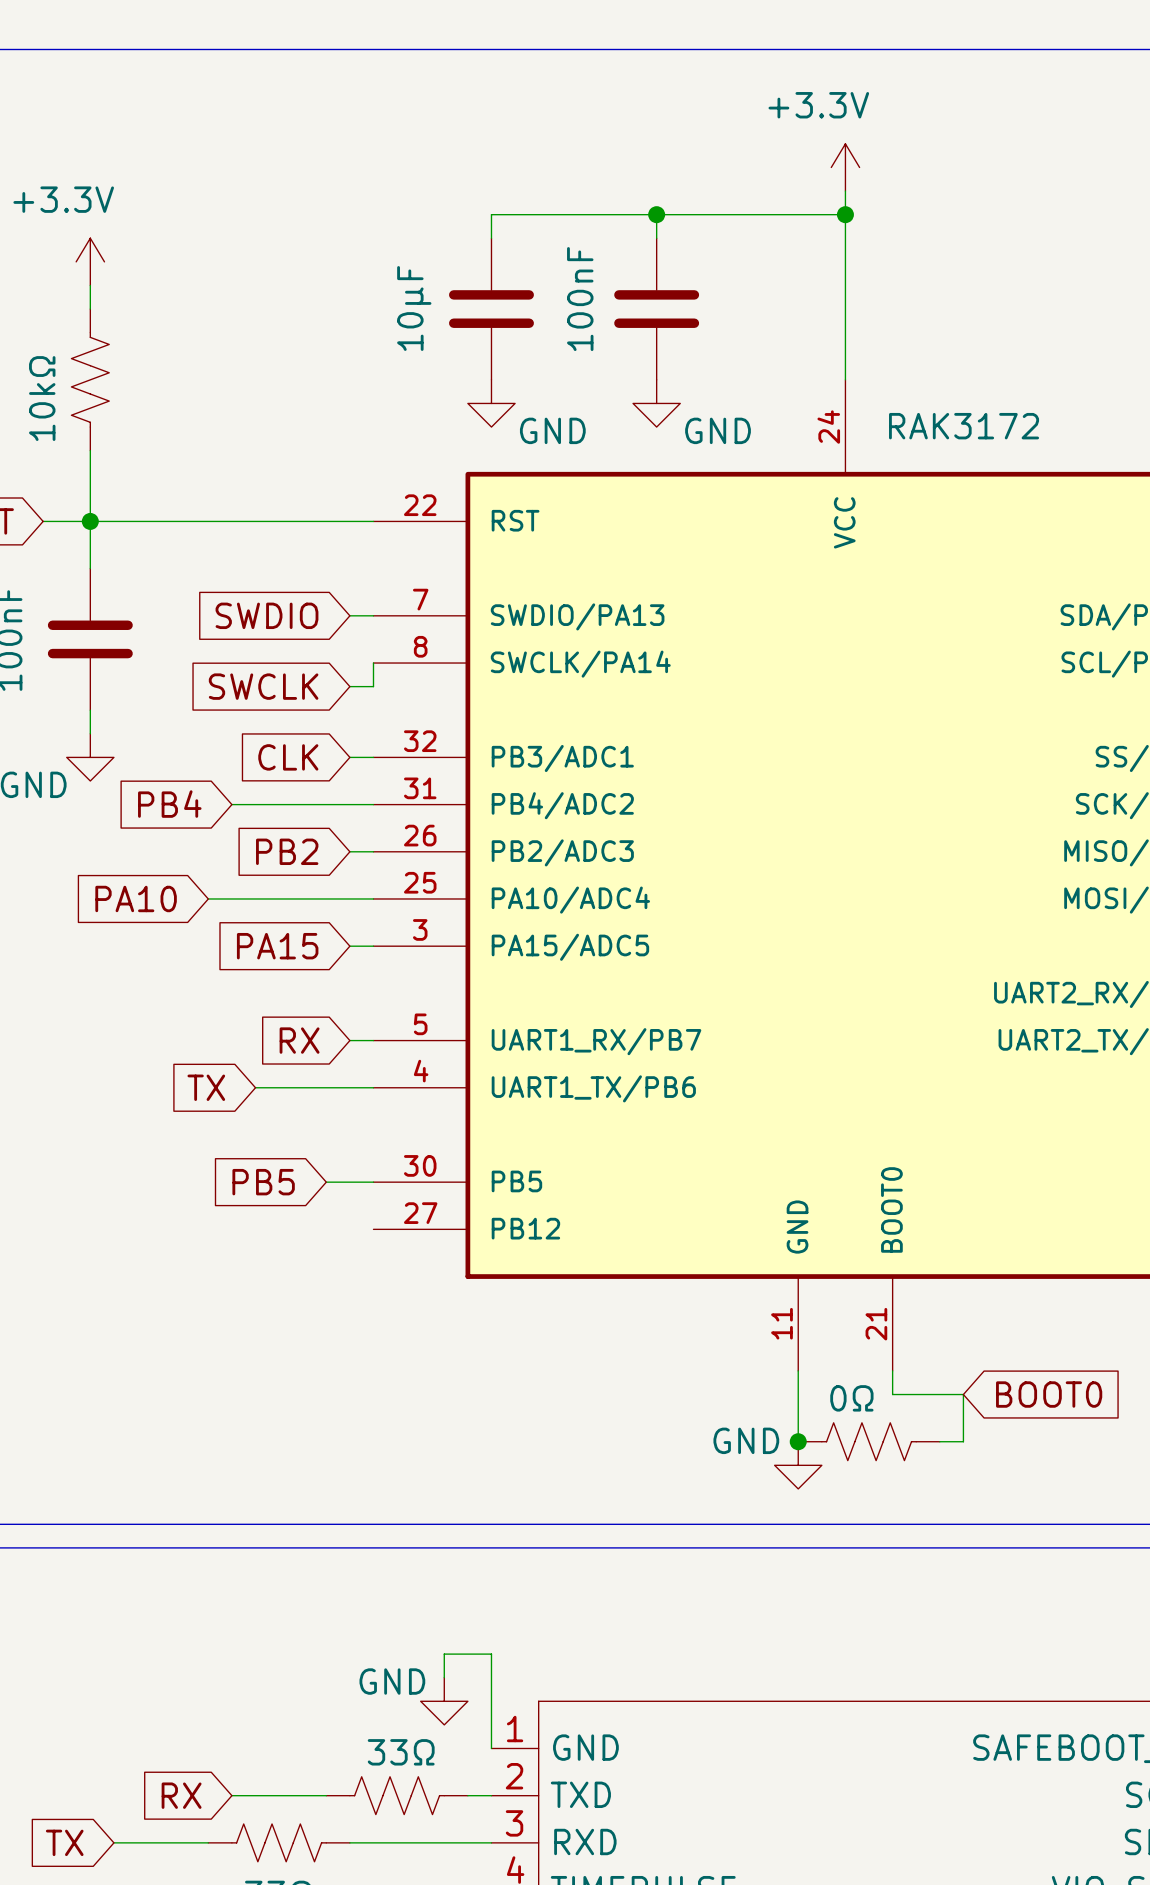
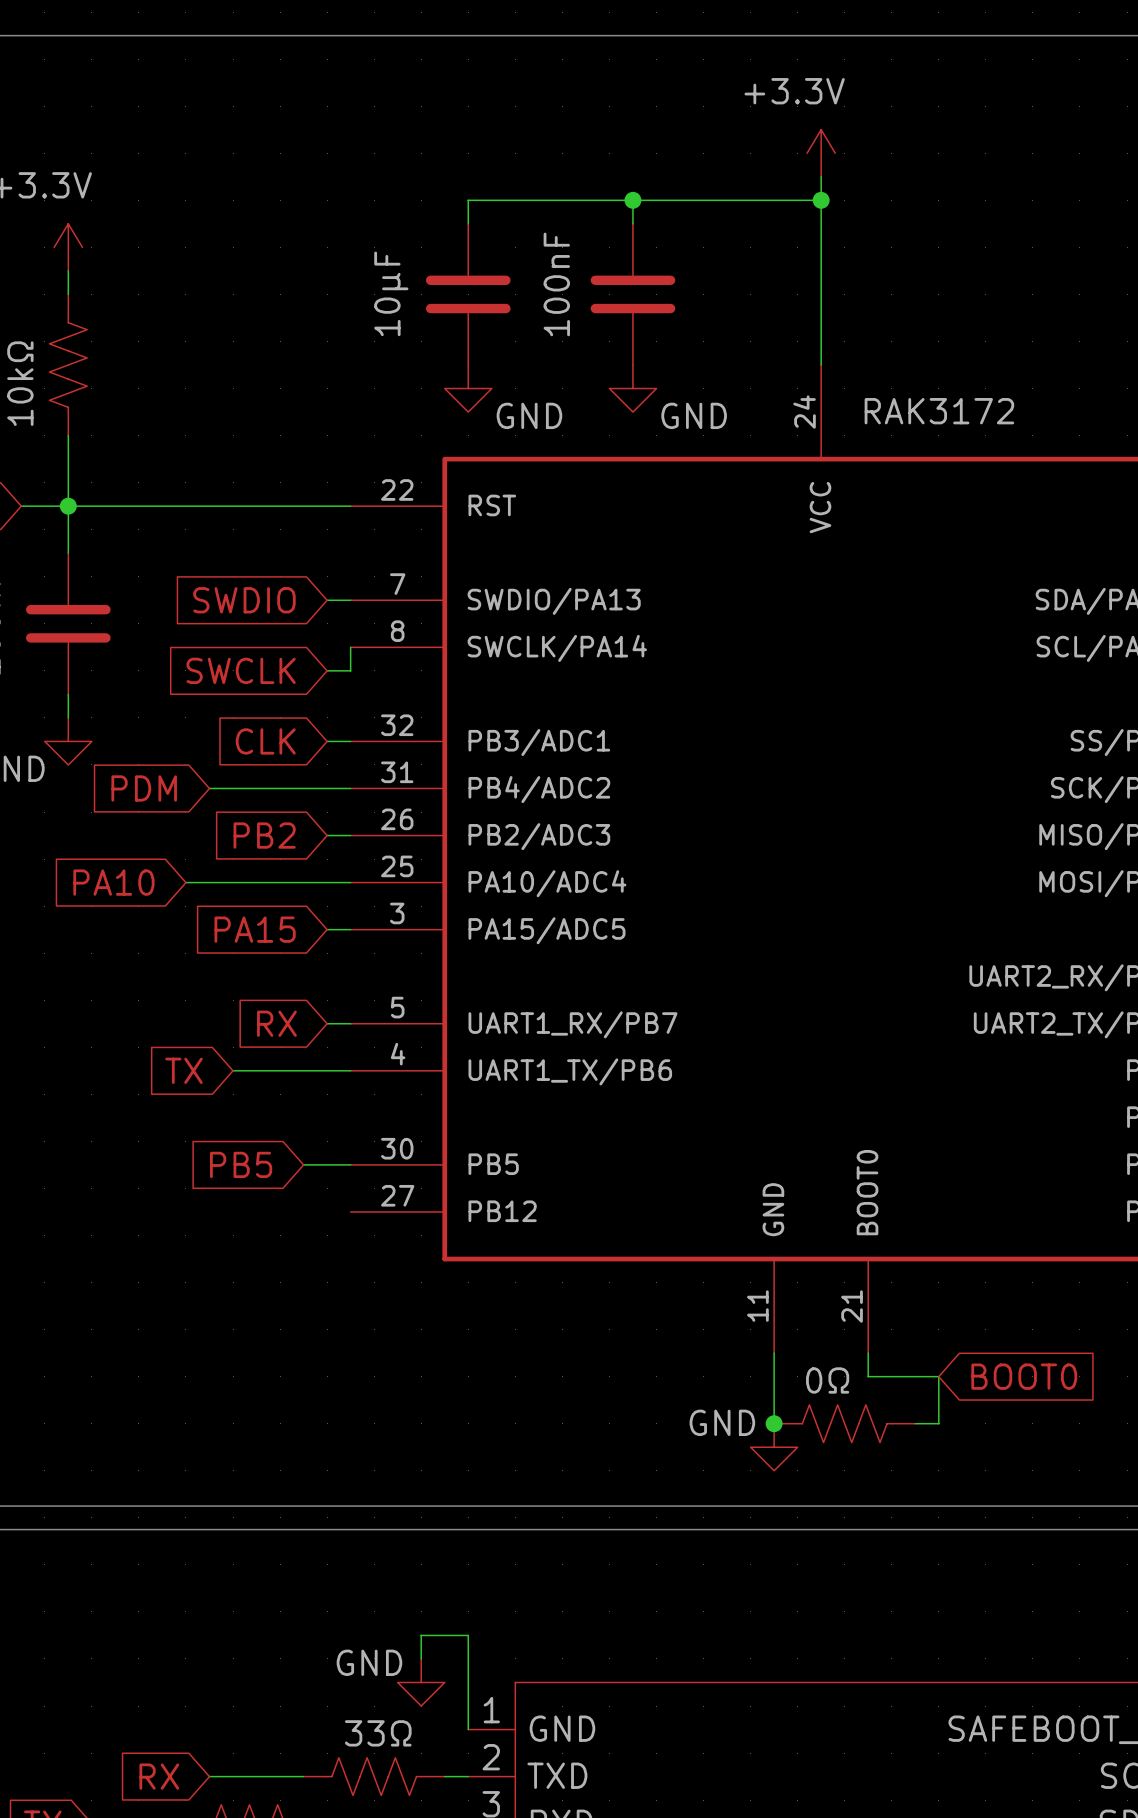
global label: PB4 (169, 804) -> PDM (144, 788)

